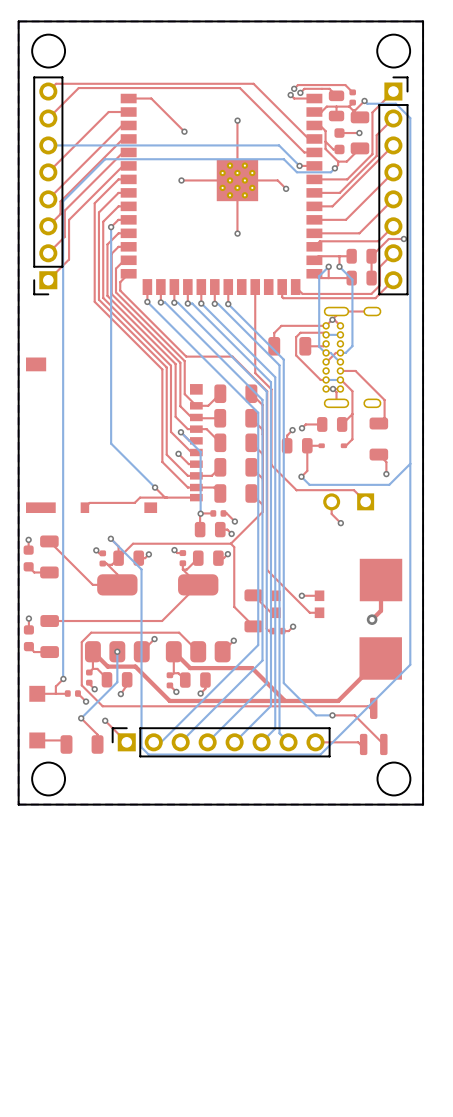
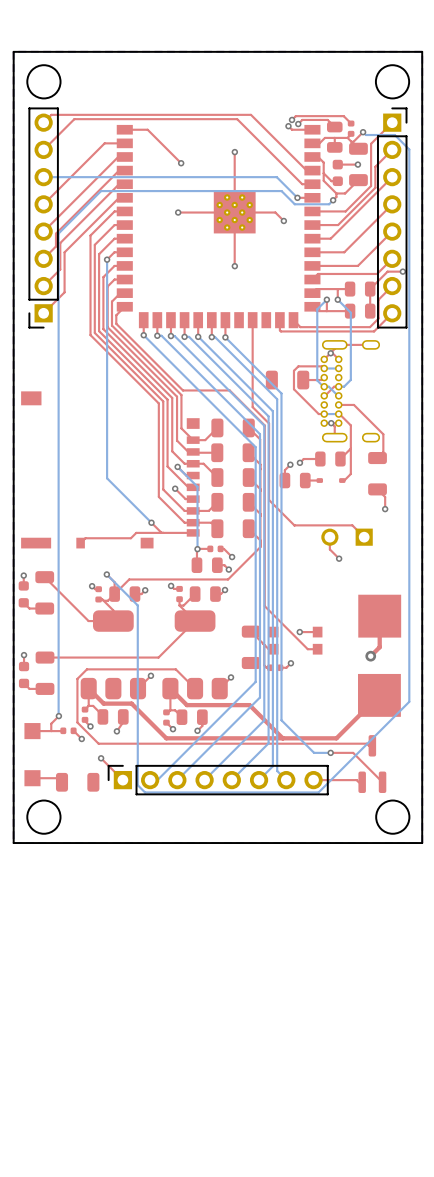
top track: (326, 325) (281, 325) (274, 333) (274, 346) -> none
top track: (307, 445) (307, 470) (301, 476) -> none
bottom track: (410, 463) (389, 484) (309, 484) (301, 476) -> none
via: (301, 476) -> none
top track: (230, 543) (234, 547) (234, 606) (253, 626) -> none
bottom track: (117, 651) (117, 682) (81, 718) -> none
via: (117, 651) -> none
top track: (81, 718) (97, 734) (97, 744) -> none
via: (81, 718) -> none

